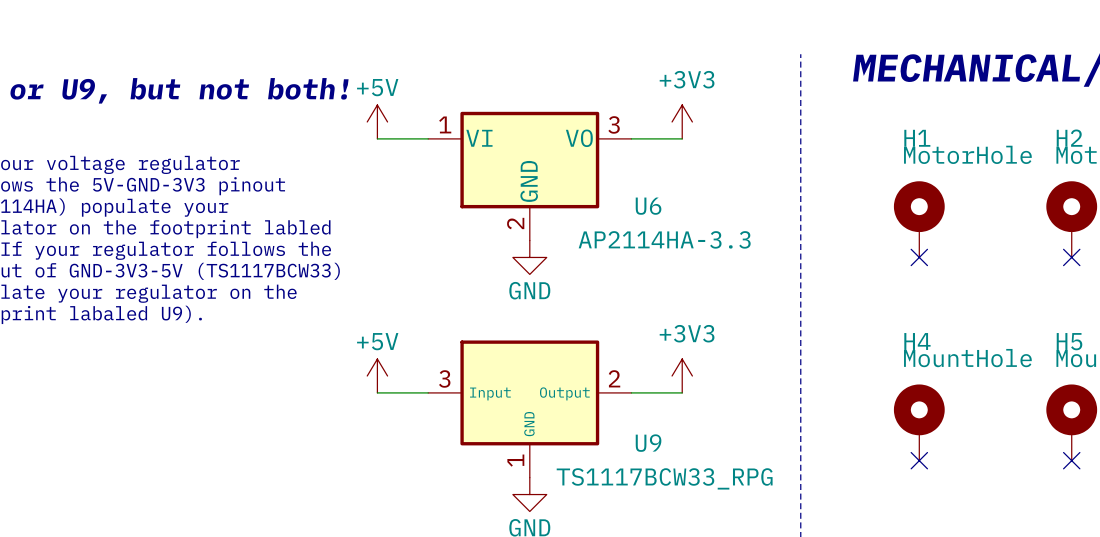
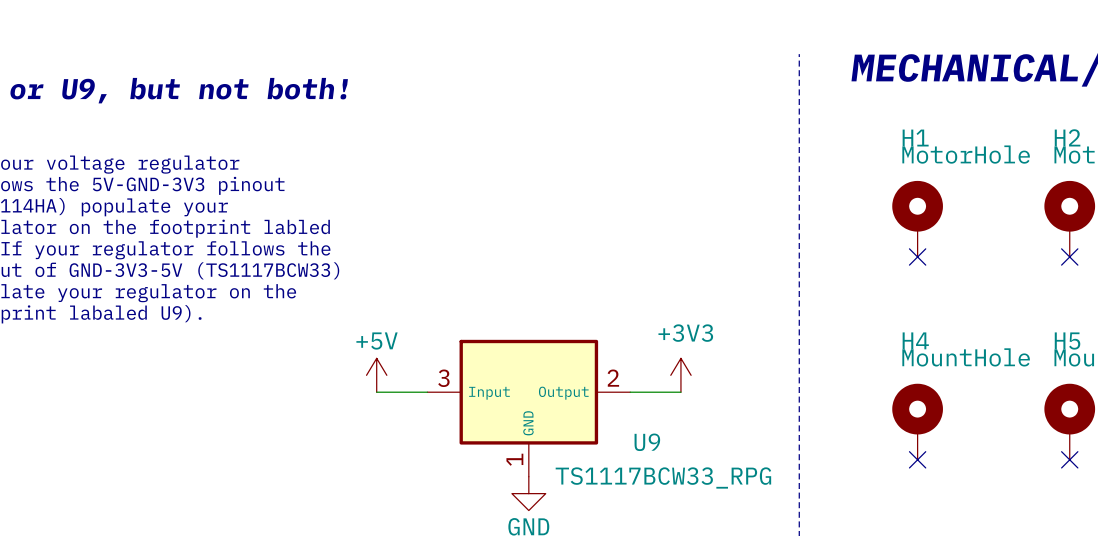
power symbol: +5V (377, 121) -> none
power symbol: +3V3 (682, 121) -> none
wire: (377, 138) (428, 138) -> none
wire: (631, 138) (682, 138) -> none
U6: AP2114HA-3.3 (529, 176) -> none
power symbol: GND (529, 257) -> none

